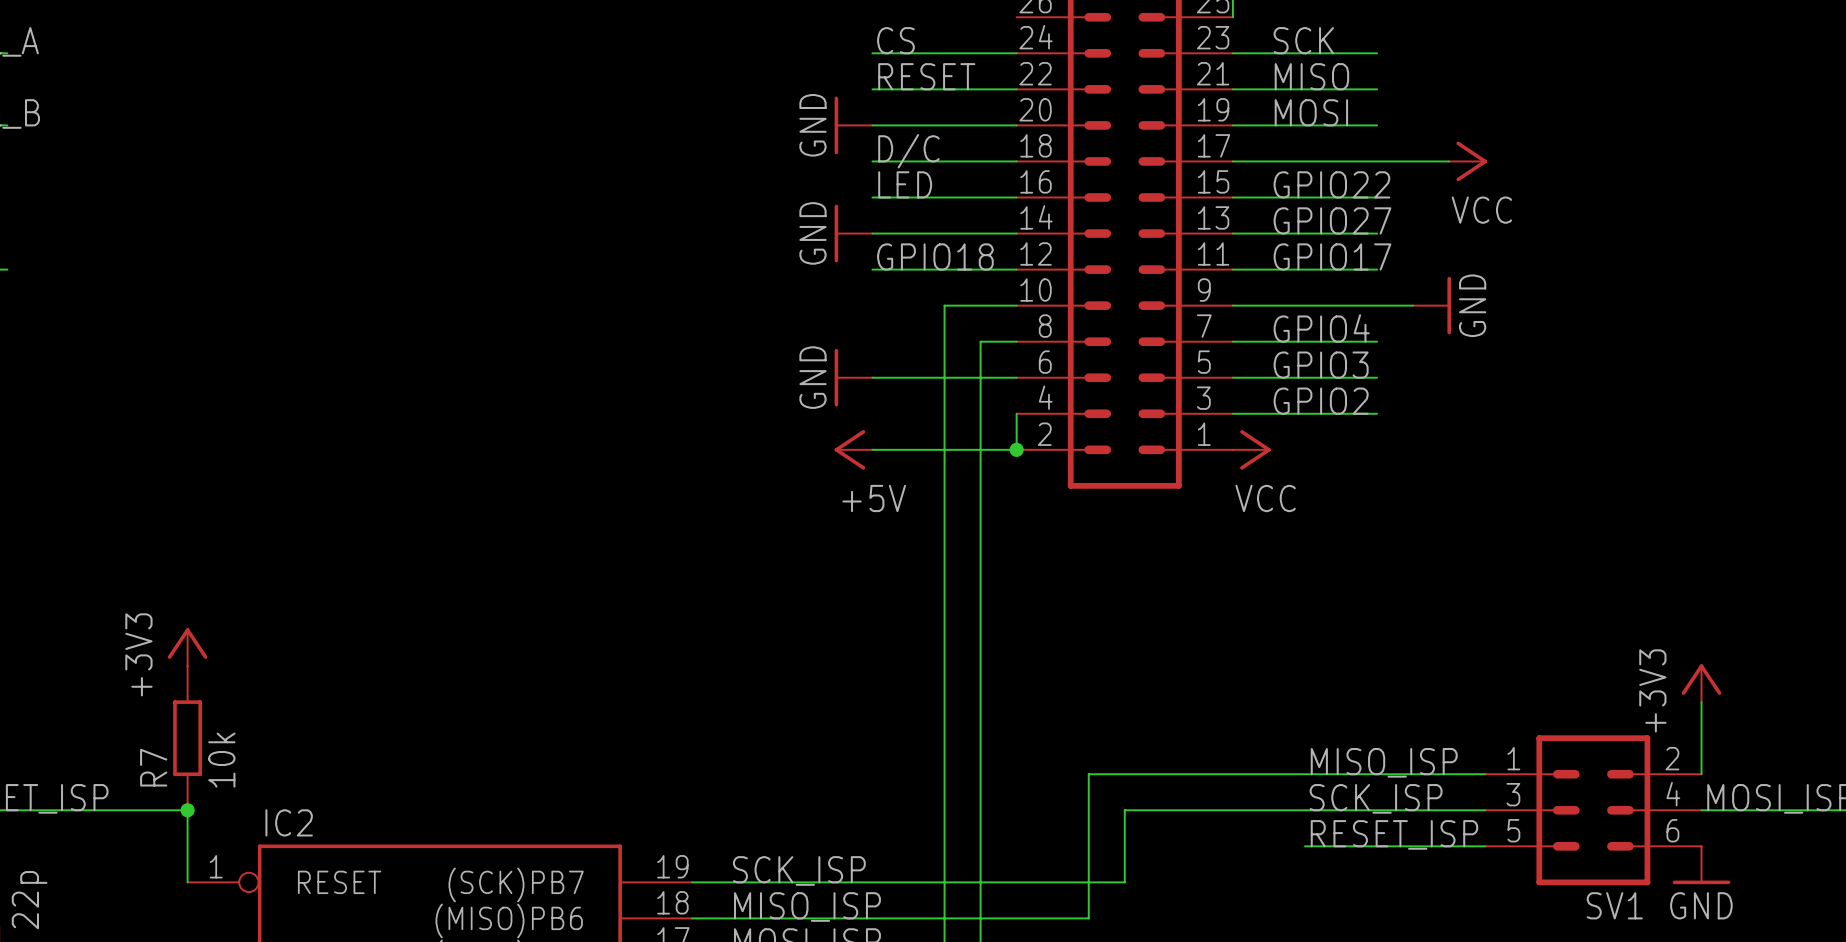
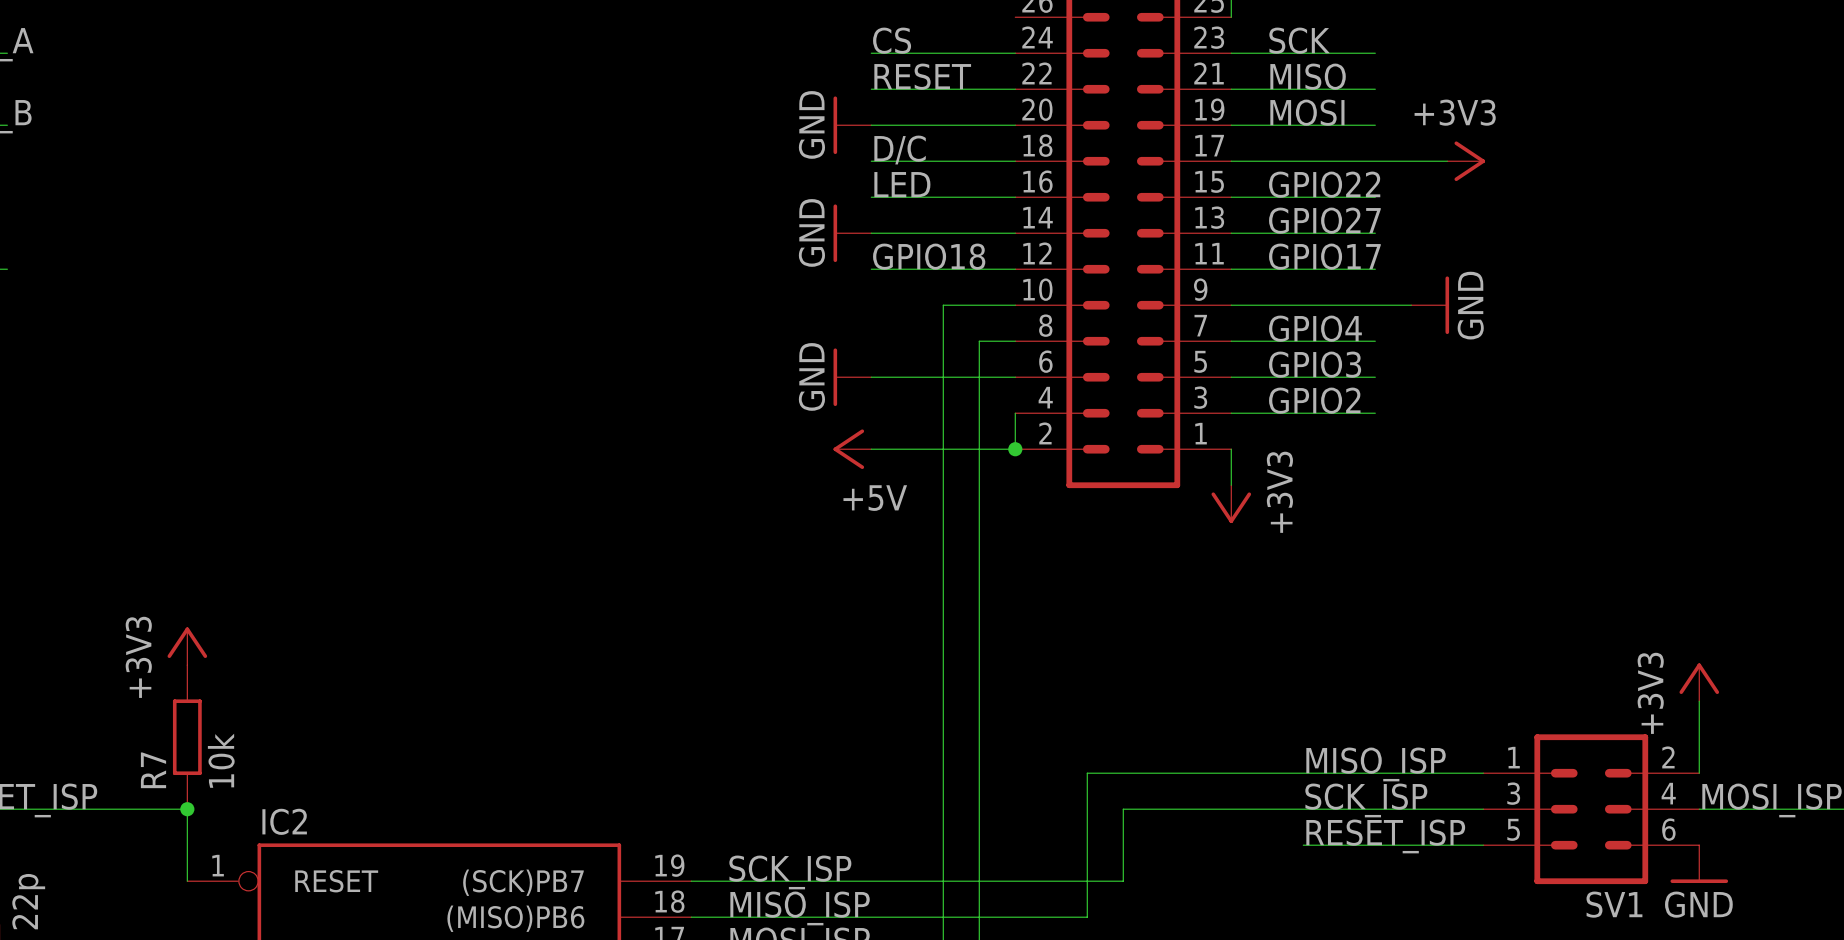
power symbol: VCC (1468, 161) -> +3V3 (1466, 161)
wire: none -> (1231, 449) (1231, 485)
power symbol: VCC (1251, 449) -> none
power symbol: none -> +3V3 (1231, 504)

